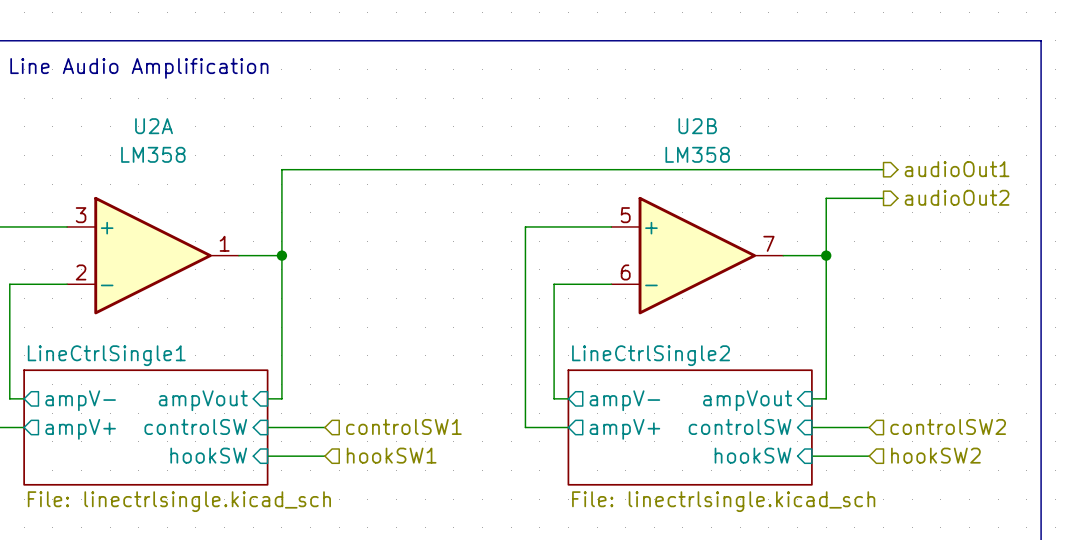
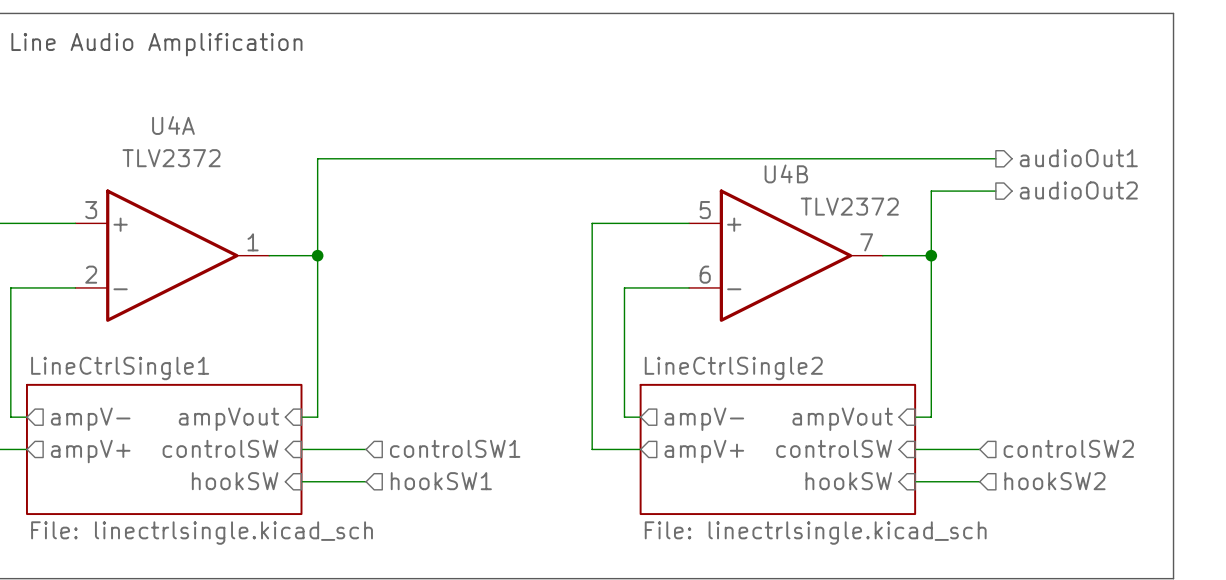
U2A name: U2A (154, 126) -> U4A (173, 125)
U2B name: U2B (697, 126) -> U4B (786, 173)
U2A value: LM358 (153, 154) -> TLV2372 (171, 158)
U2B value: LM358 (697, 154) -> TLV2372 (849, 206)

